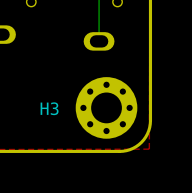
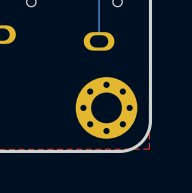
H3 name: H3 (49, 108) -> none

